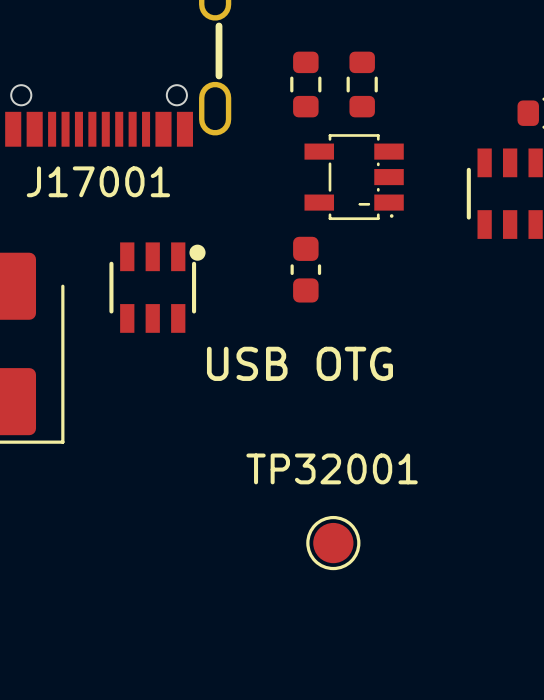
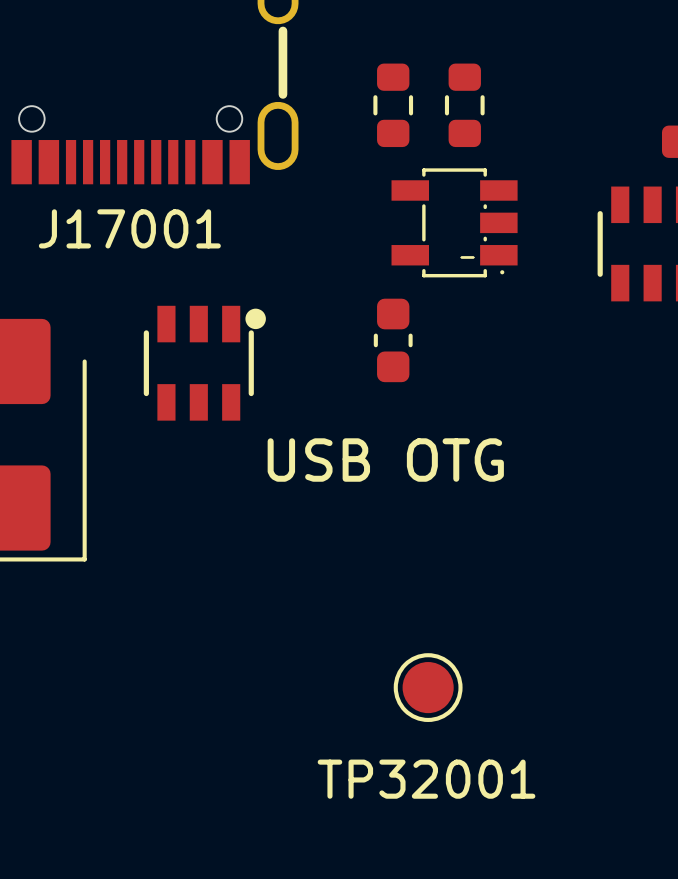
TP32001 name position: TP32001 (332, 468) -> TP32001 (426, 779)

